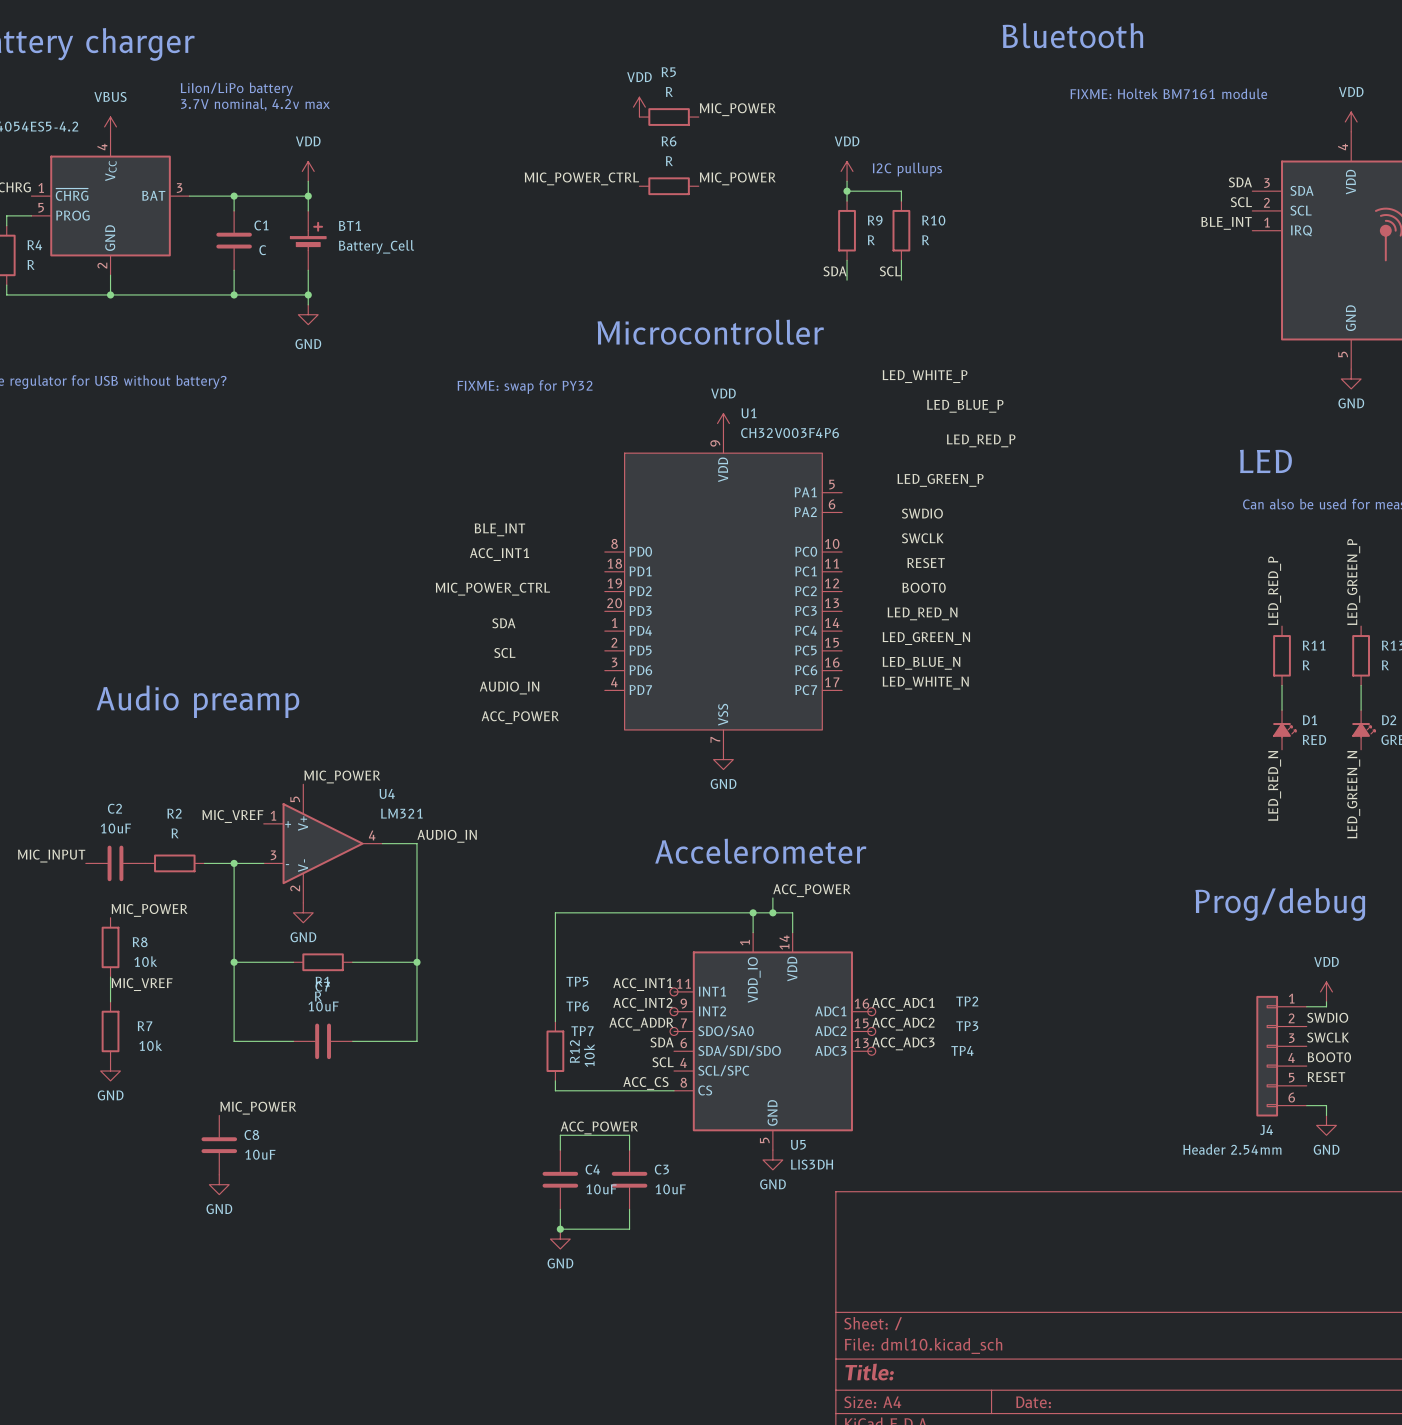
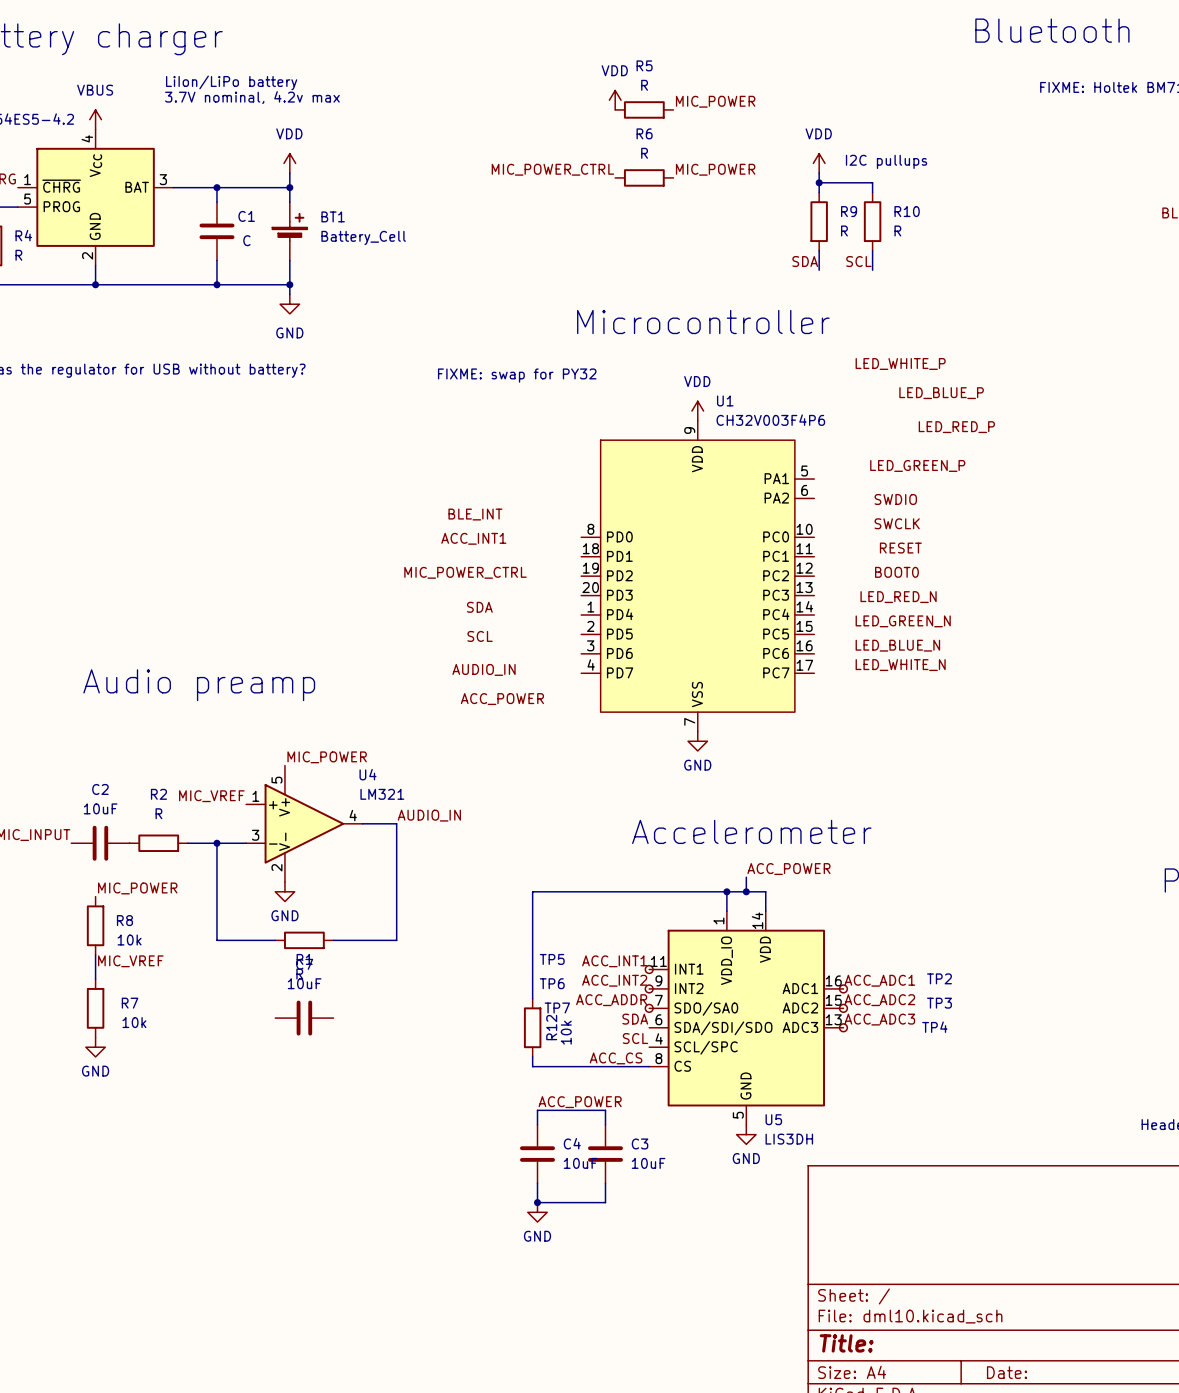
wire: (234, 962) (234, 1041) (293, 1041) -> none
junction: (234, 962) -> none
wire: (416, 962) (416, 1041) (352, 1041) -> none
junction: (416, 962) -> none
label: MIC_POWER (258, 1108) -> none
C8: 10uF (219, 1145) -> none
power symbol: GND (219, 1184) -> none

